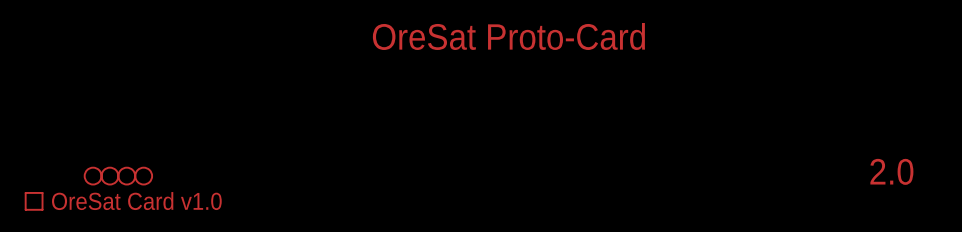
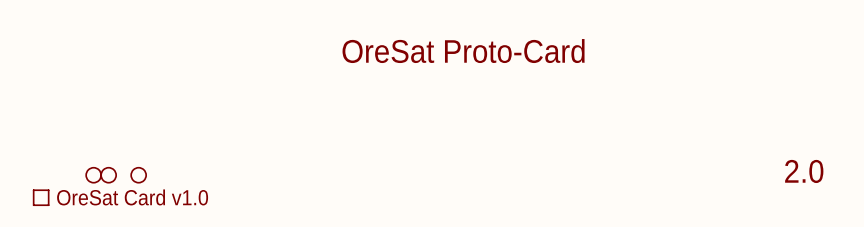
part: (126, 176) -> none

